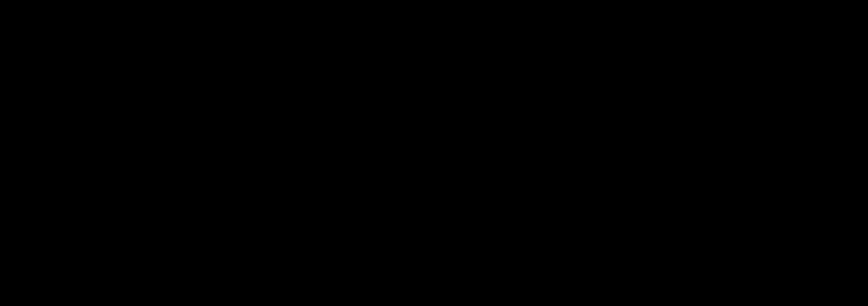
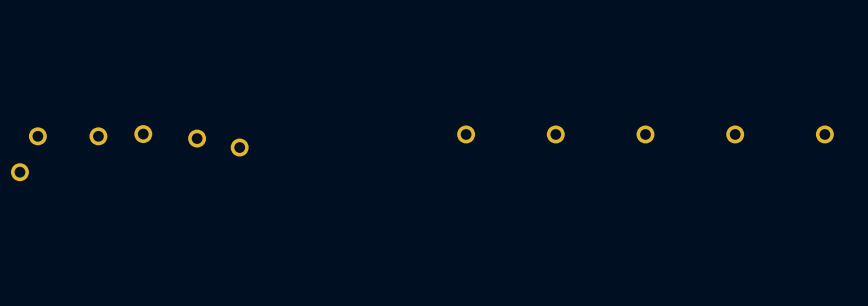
part: none -> (143, 134)
part: none -> (466, 134)
part: none -> (555, 134)
part: none -> (645, 134)
part: none -> (735, 134)
part: none -> (824, 134)
part: none -> (37, 136)
part: none -> (98, 136)
part: none -> (197, 138)
part: none -> (239, 147)
part: none -> (19, 172)

